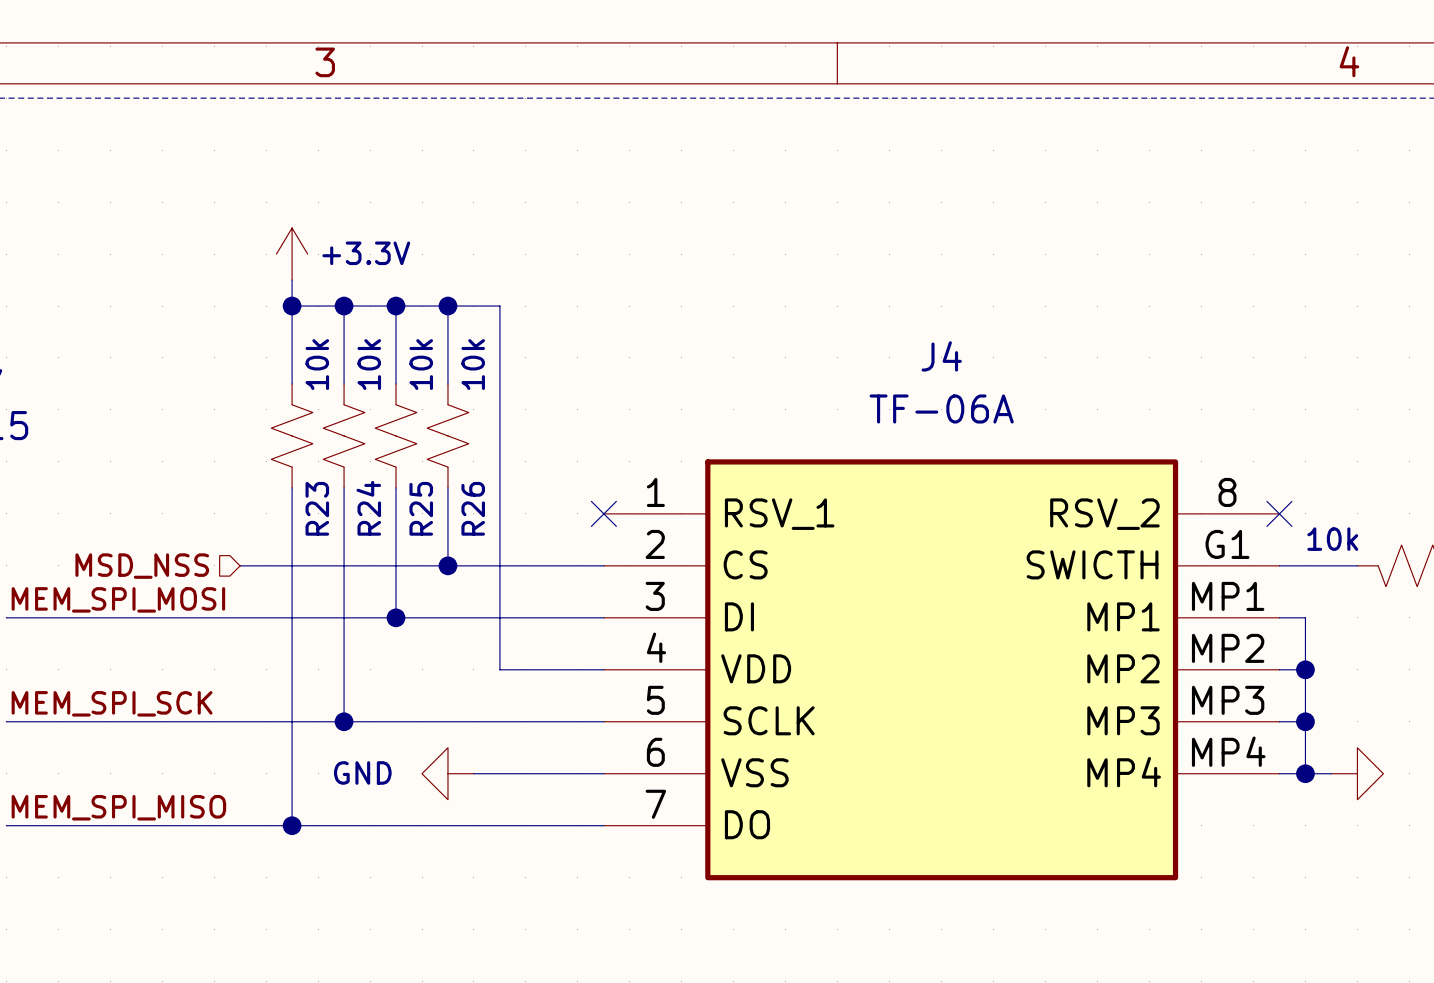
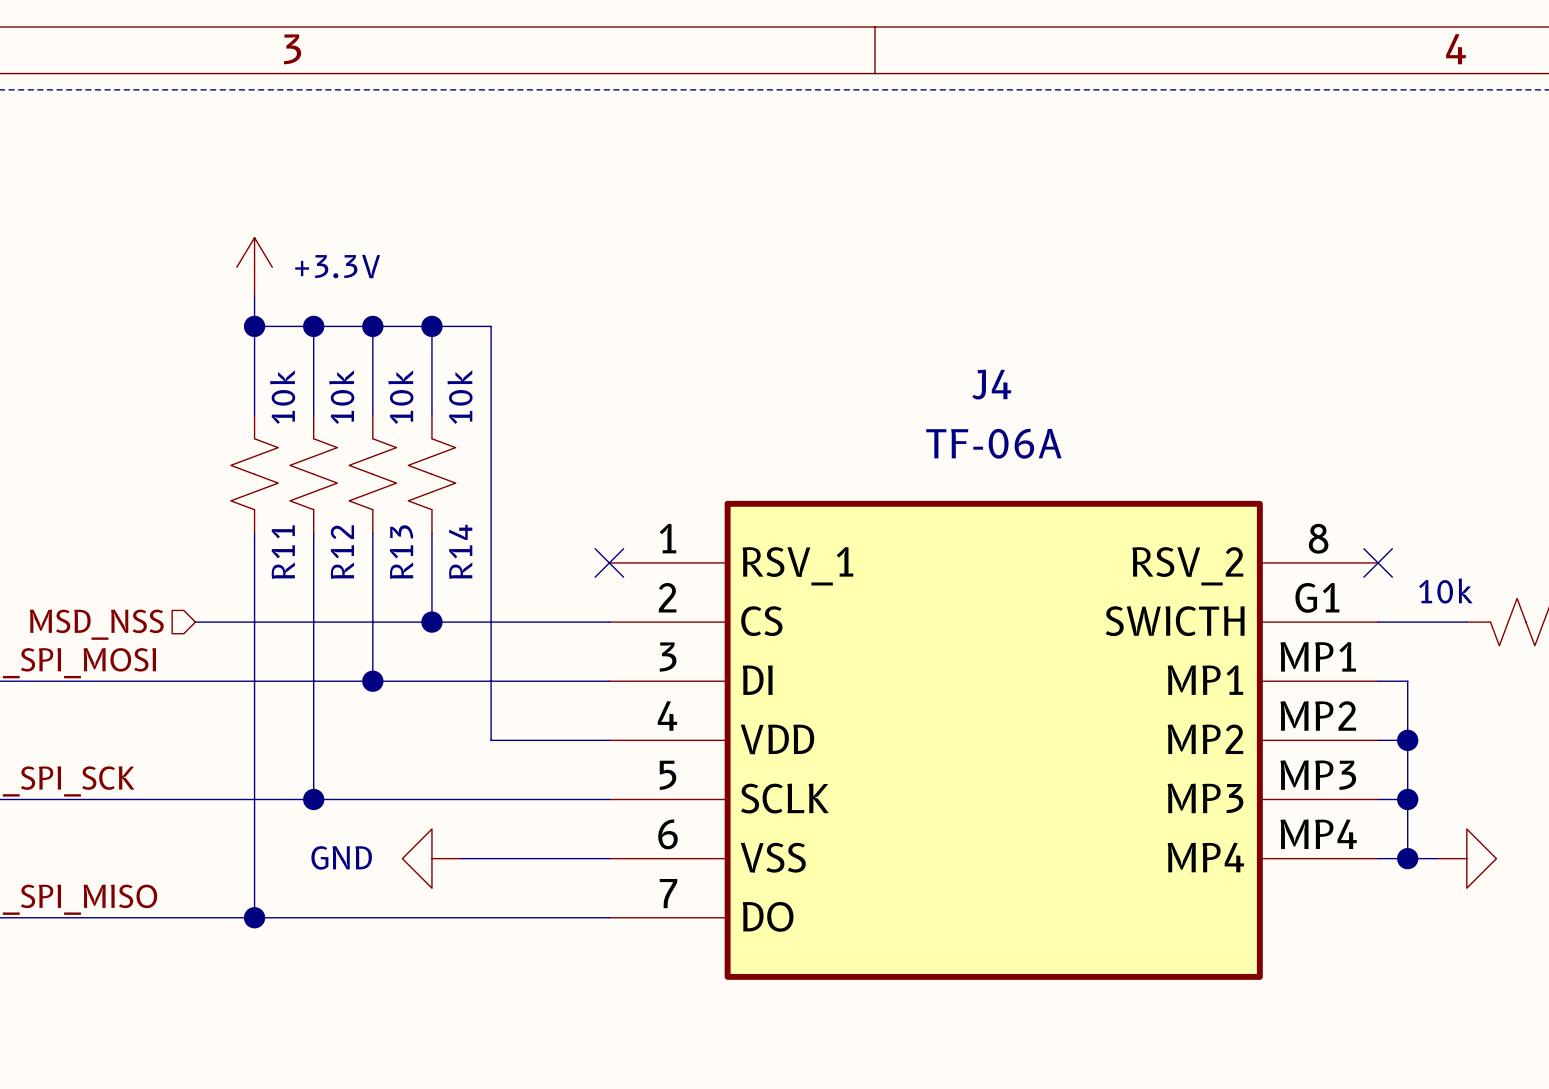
R23 name: R23 (317, 508) -> R11 (283, 552)
R24 name: R24 (368, 508) -> R12 (342, 552)
R25 name: R25 (421, 508) -> R13 (401, 552)
R26 name: R26 (473, 508) -> R14 (460, 551)

